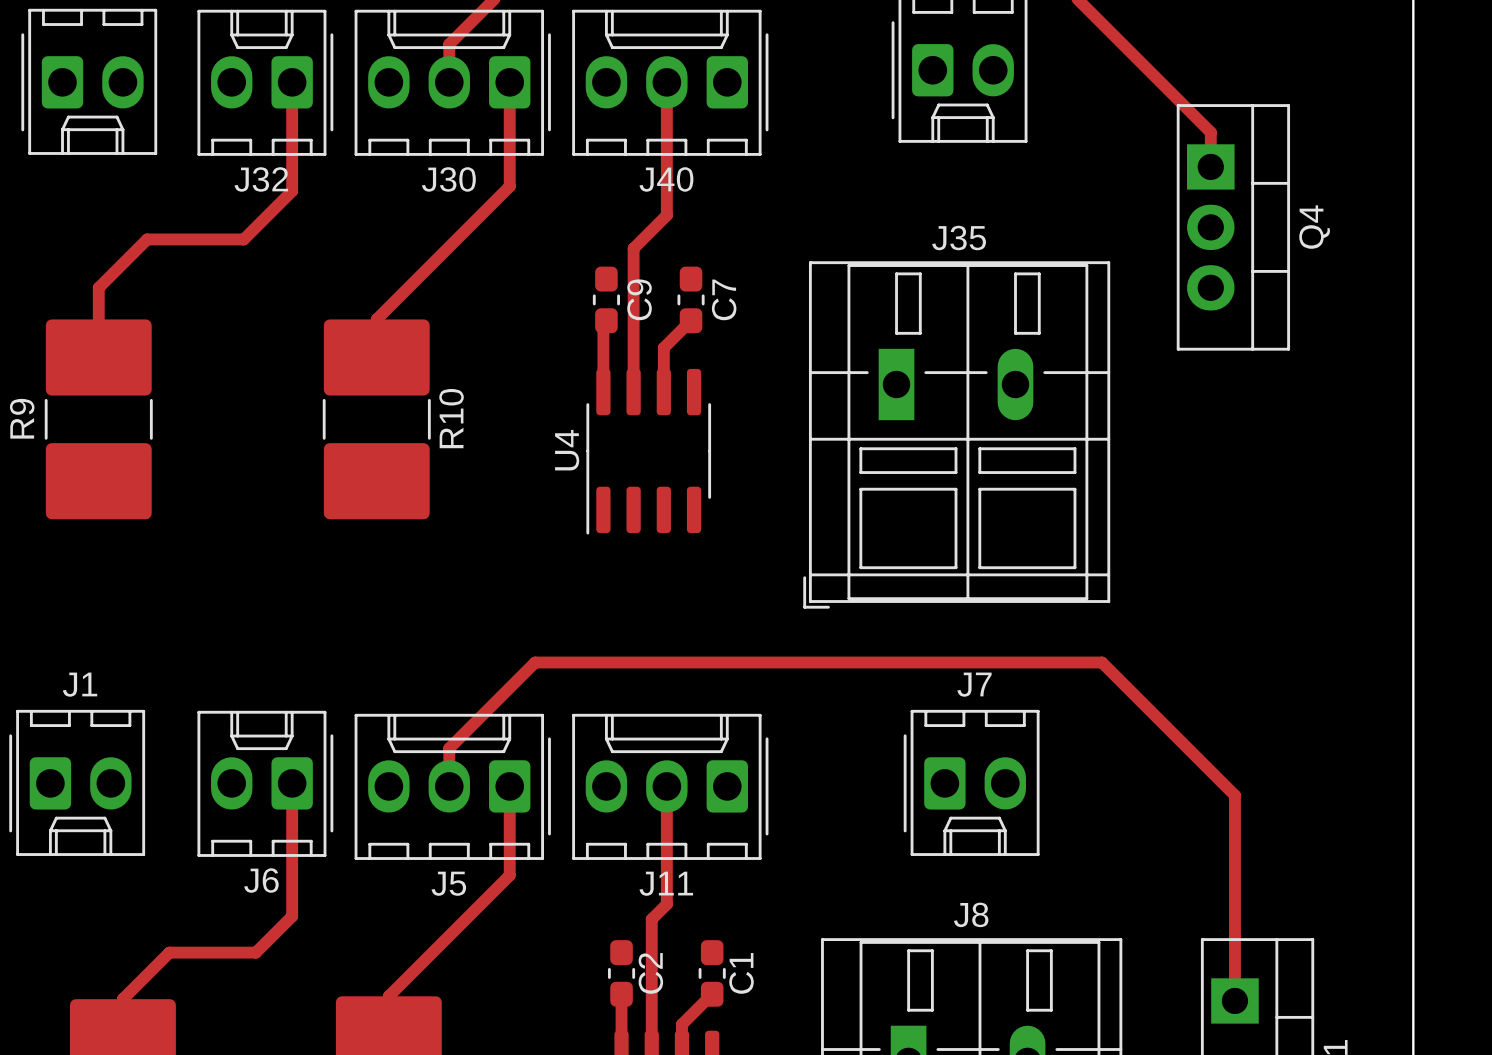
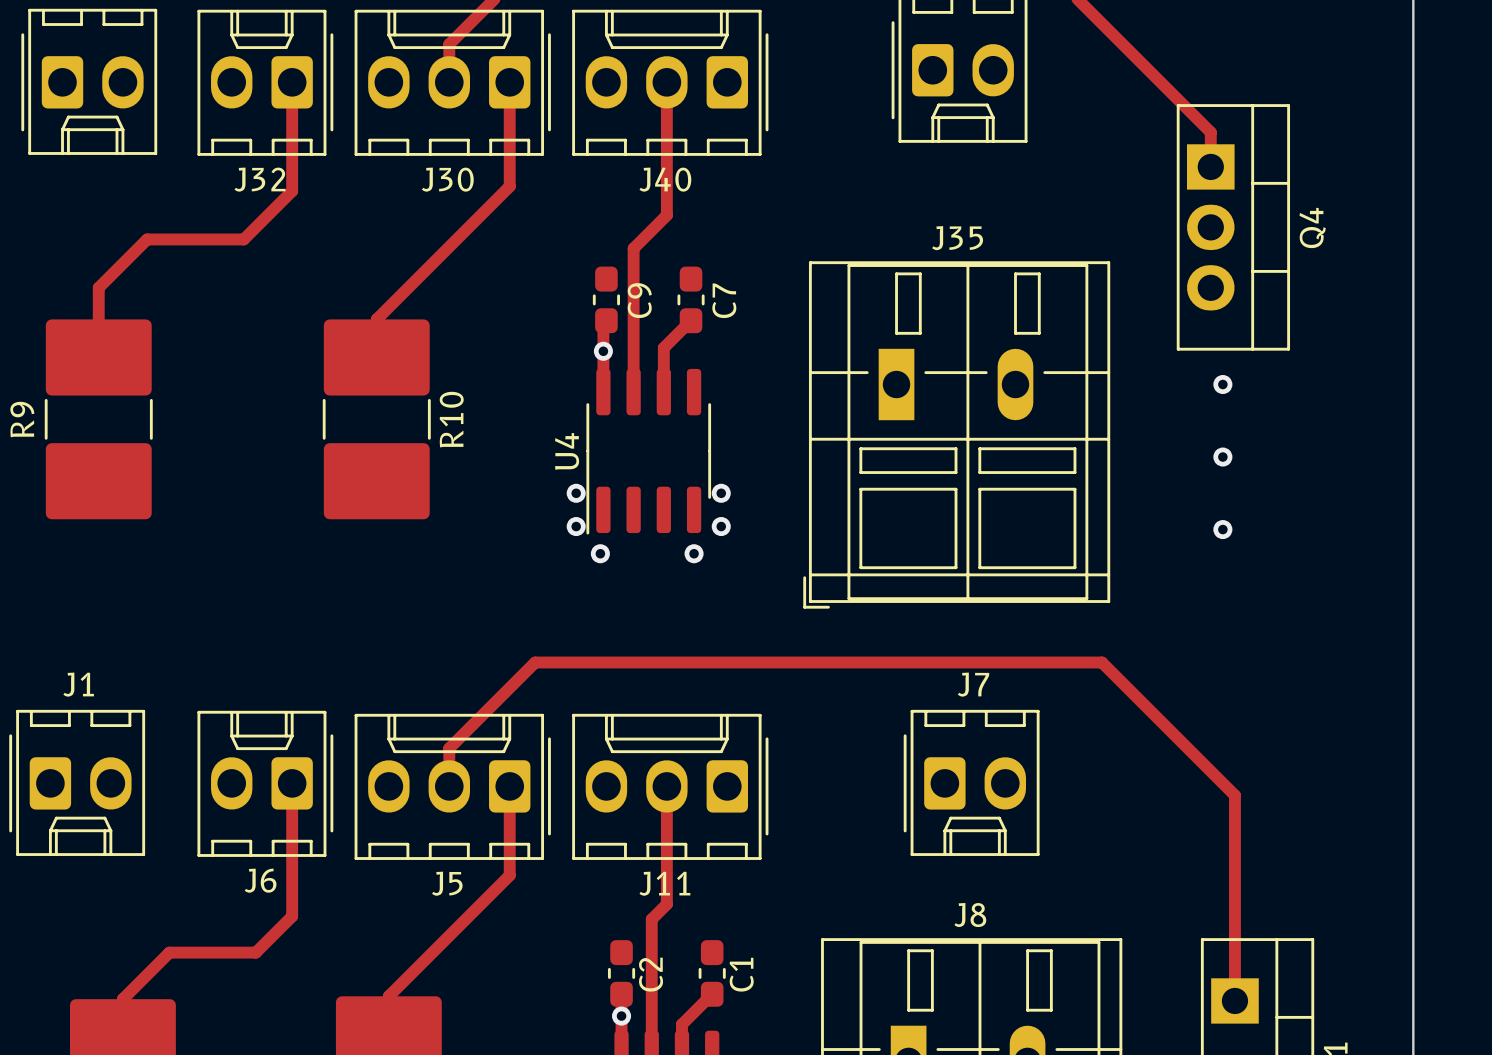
via: none -> (603, 351)
via: none -> (1222, 384)
via: none -> (1222, 457)
via: none -> (576, 493)
via: none -> (721, 493)
via: none -> (576, 526)
via: none -> (721, 526)
via: none -> (1222, 529)
via: none -> (600, 553)
via: none -> (694, 553)
via: none -> (621, 1016)

